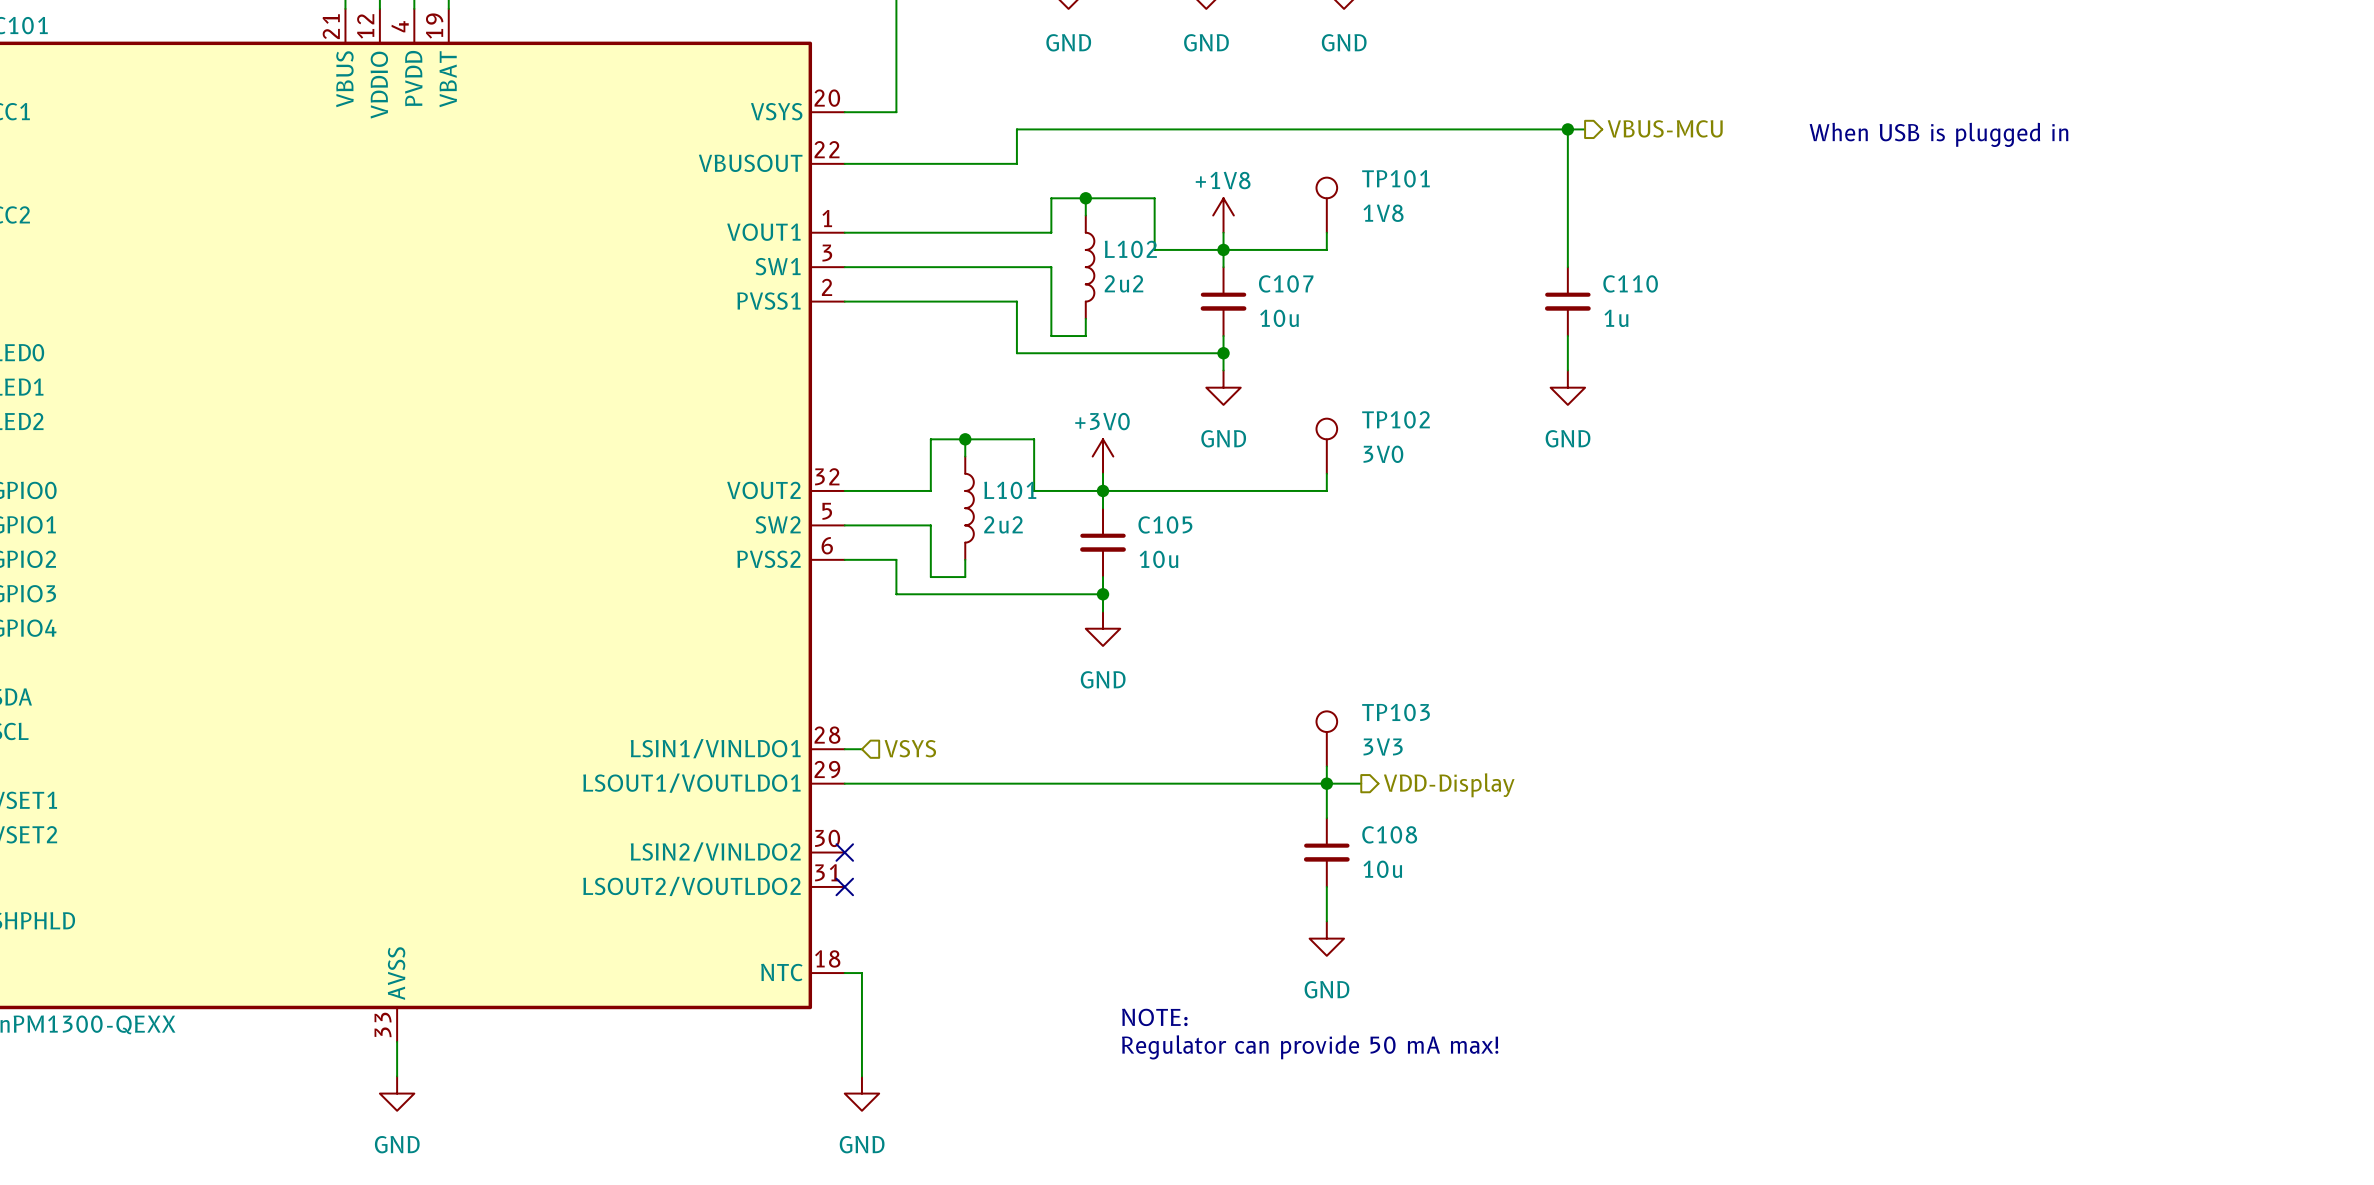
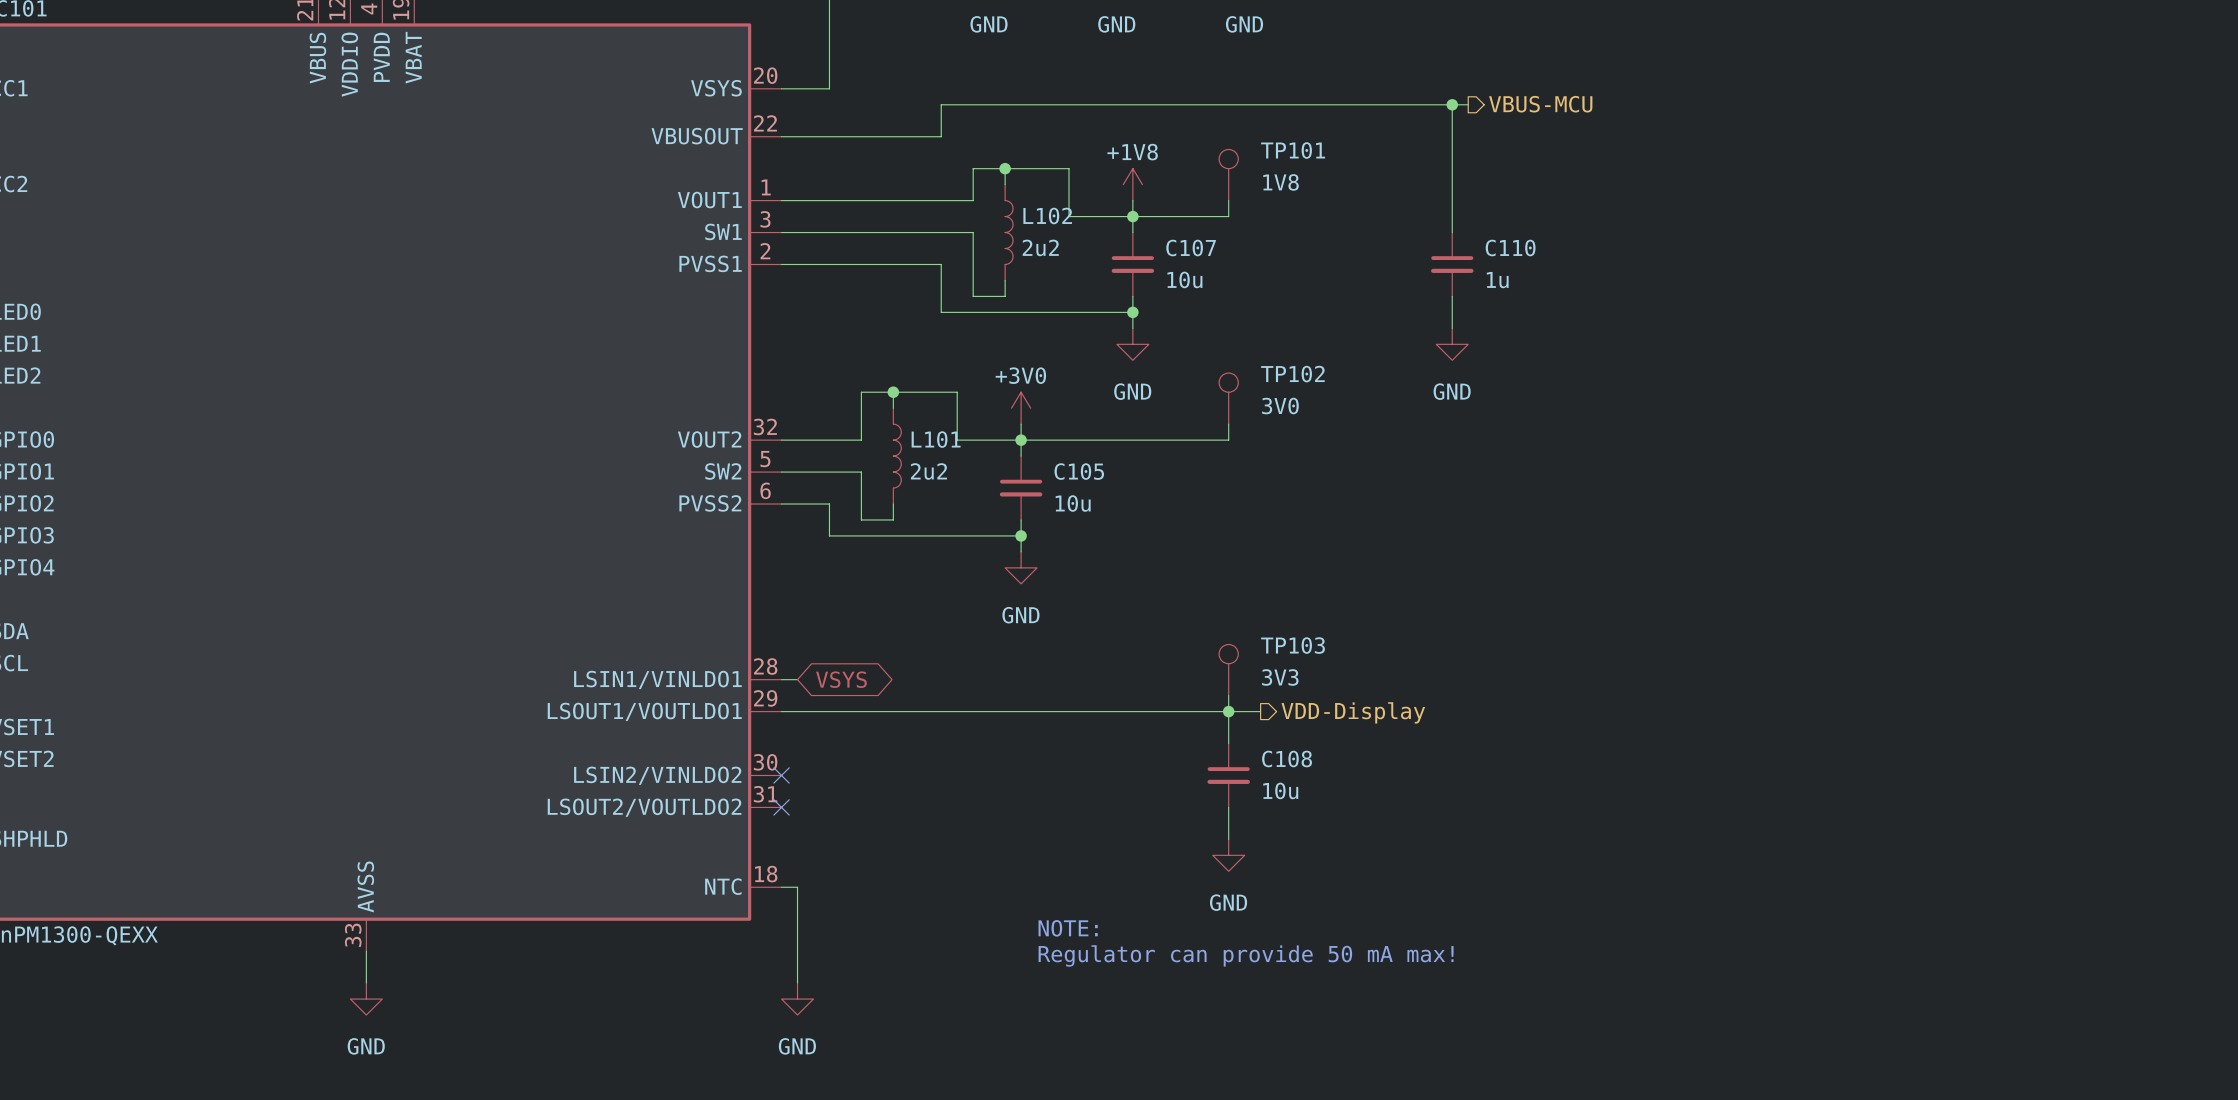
text: When USB is plugged in (1938, 134) -> none
hierarchical label: VSYS (910, 748) -> none
global label: none -> VSYS (841, 679)

